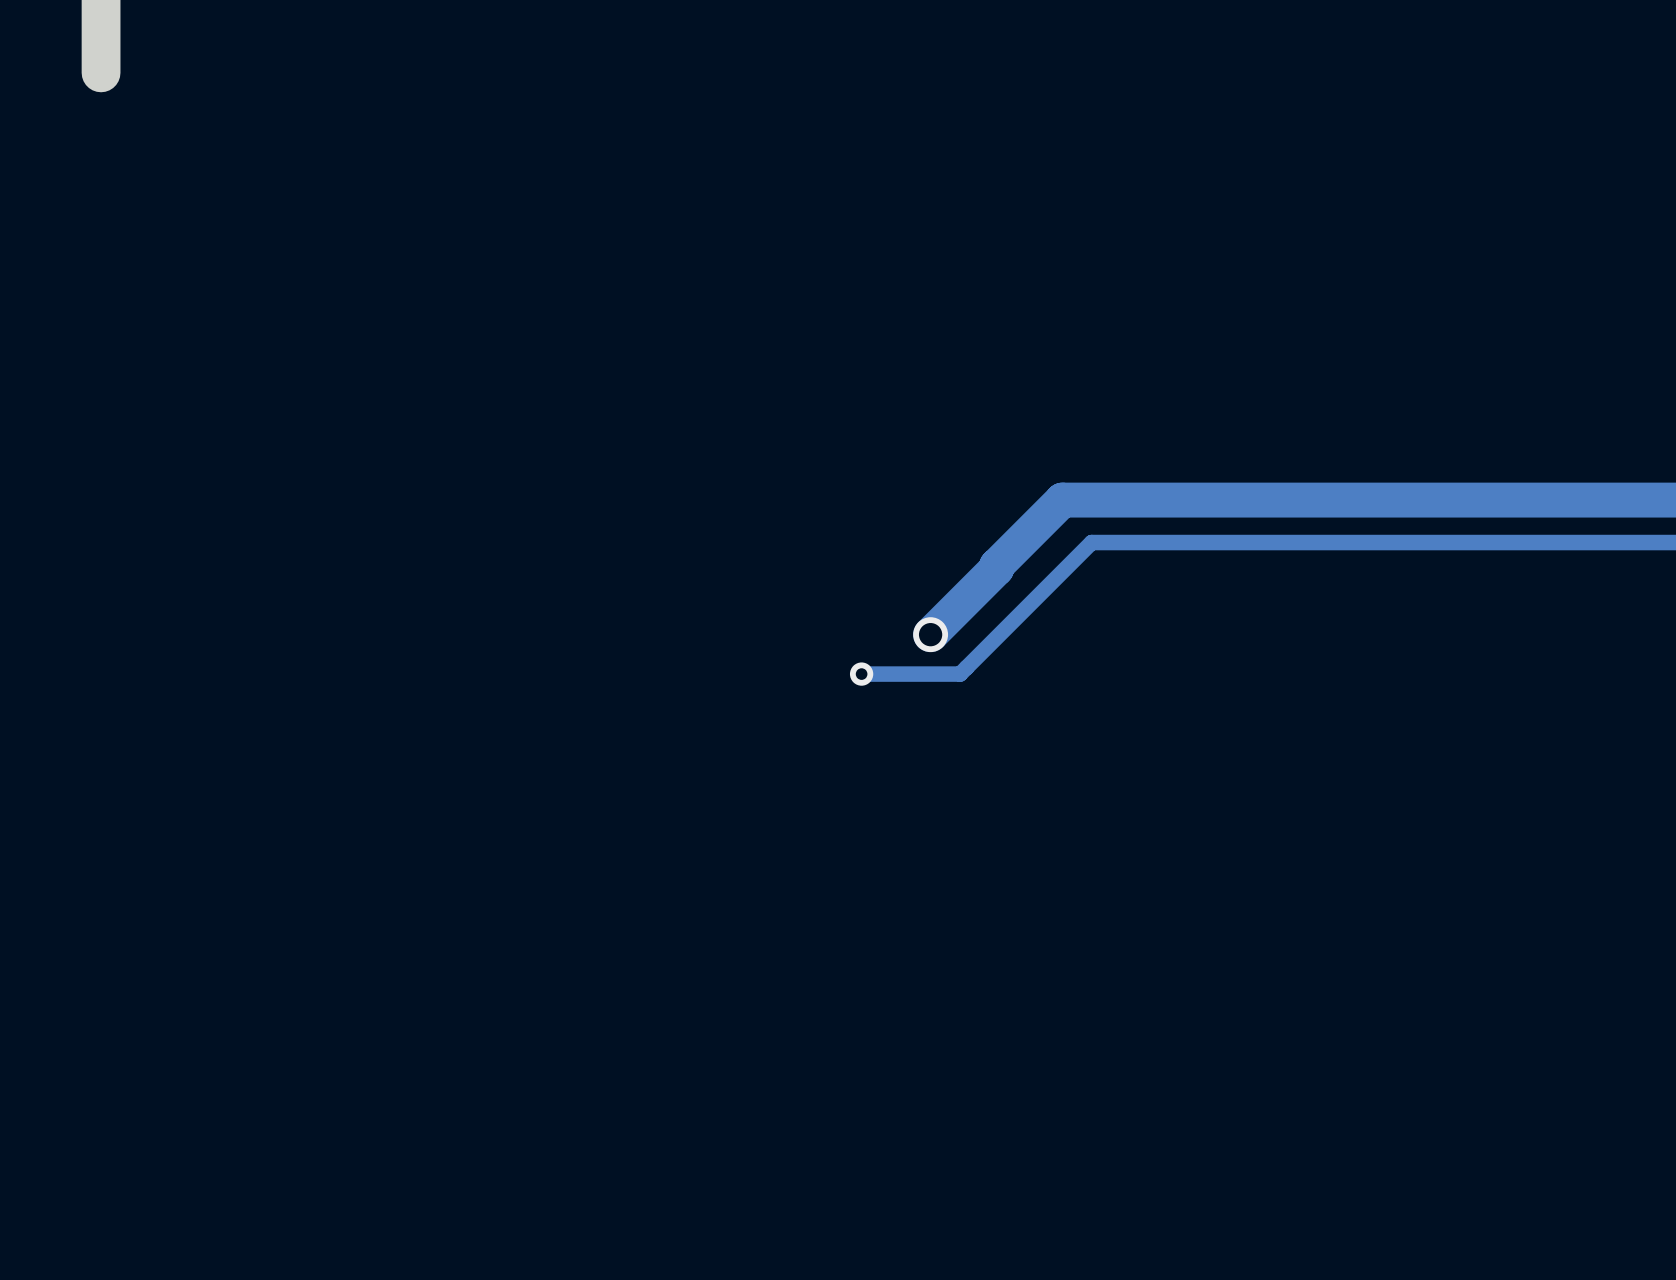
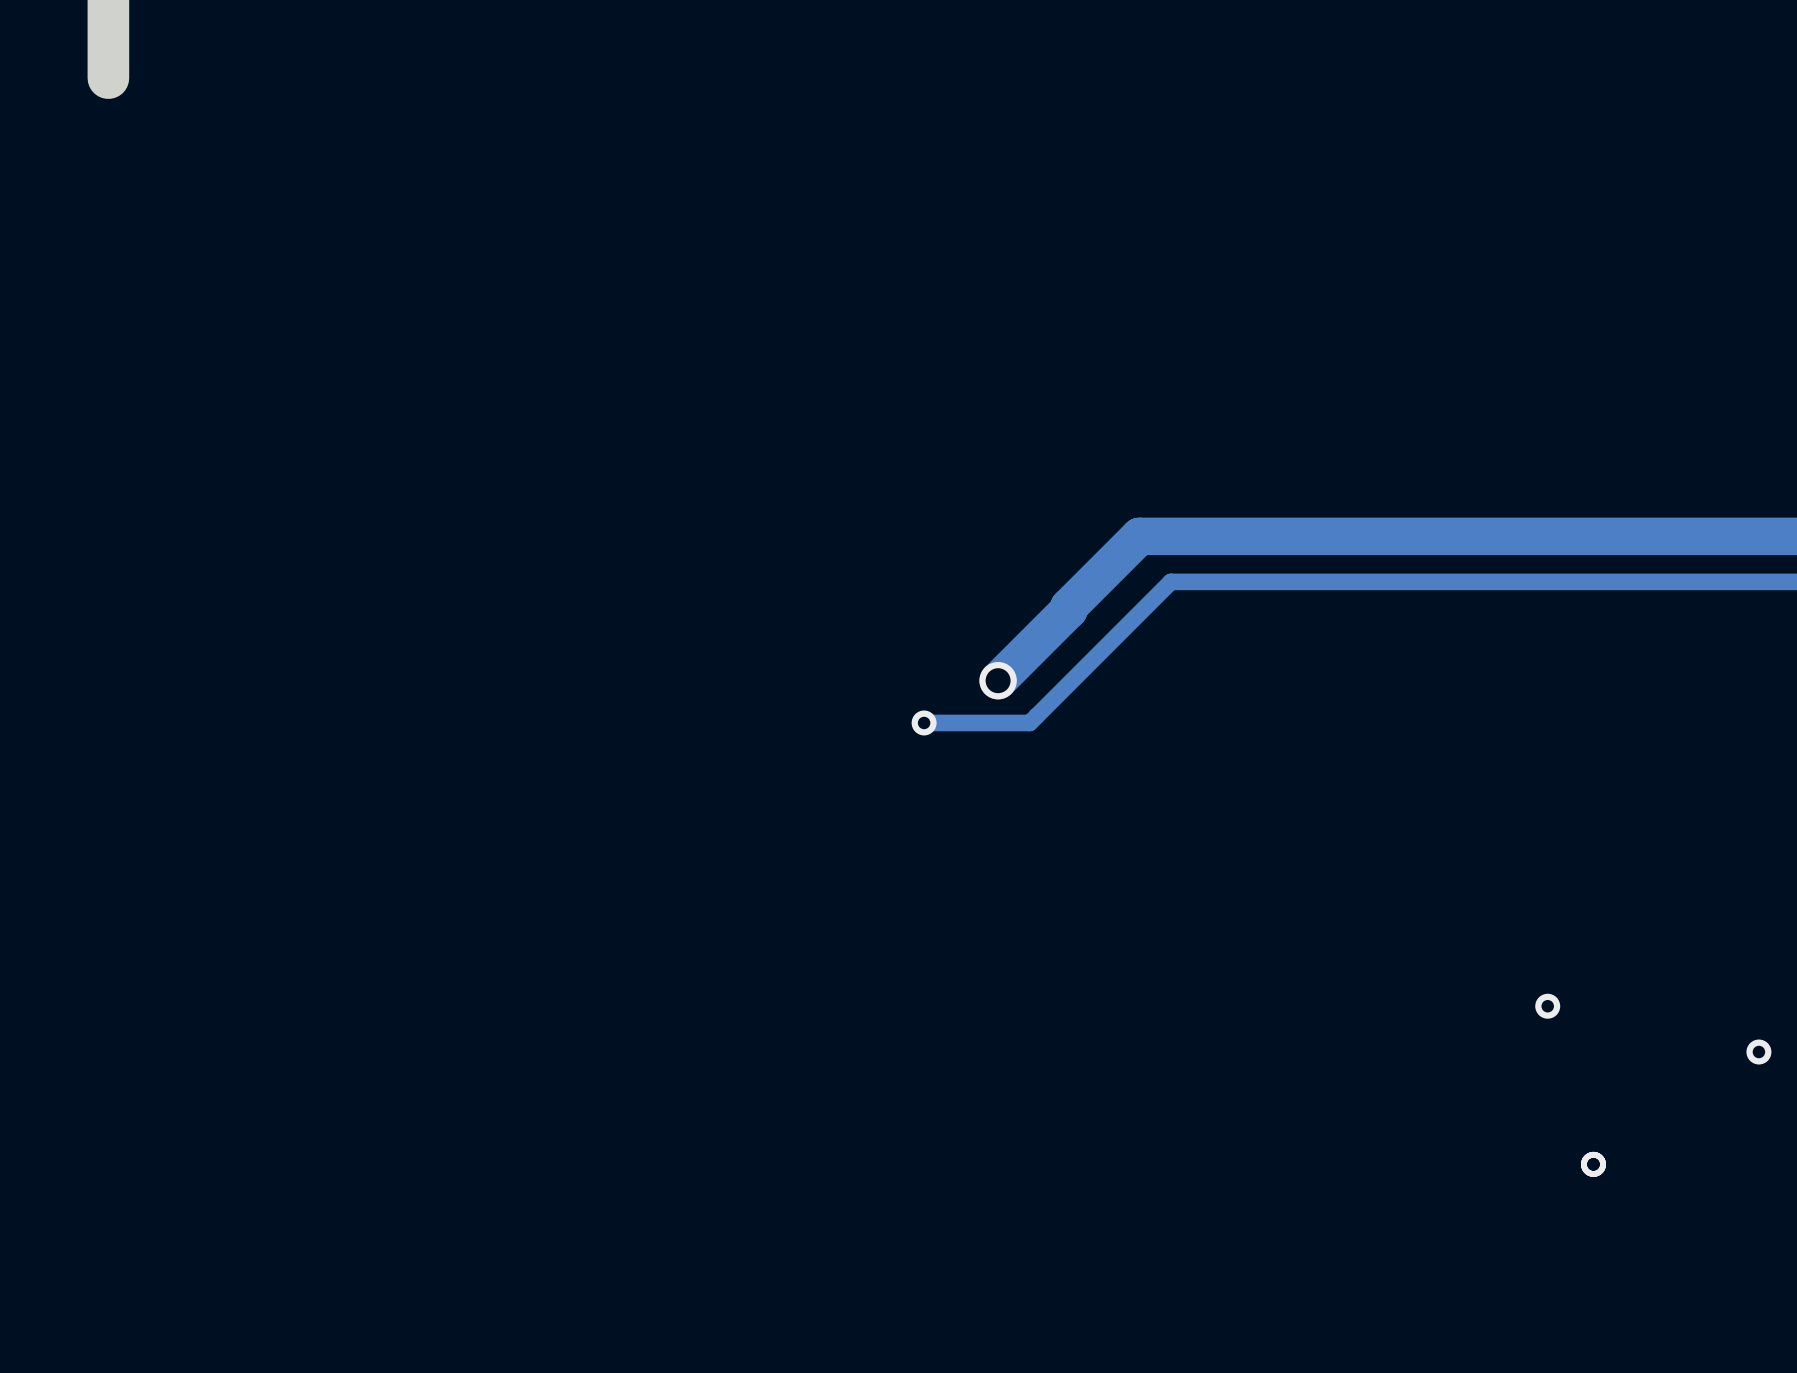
via: none -> (1547, 1006)
via: none -> (1758, 1052)
via: none -> (1593, 1164)

